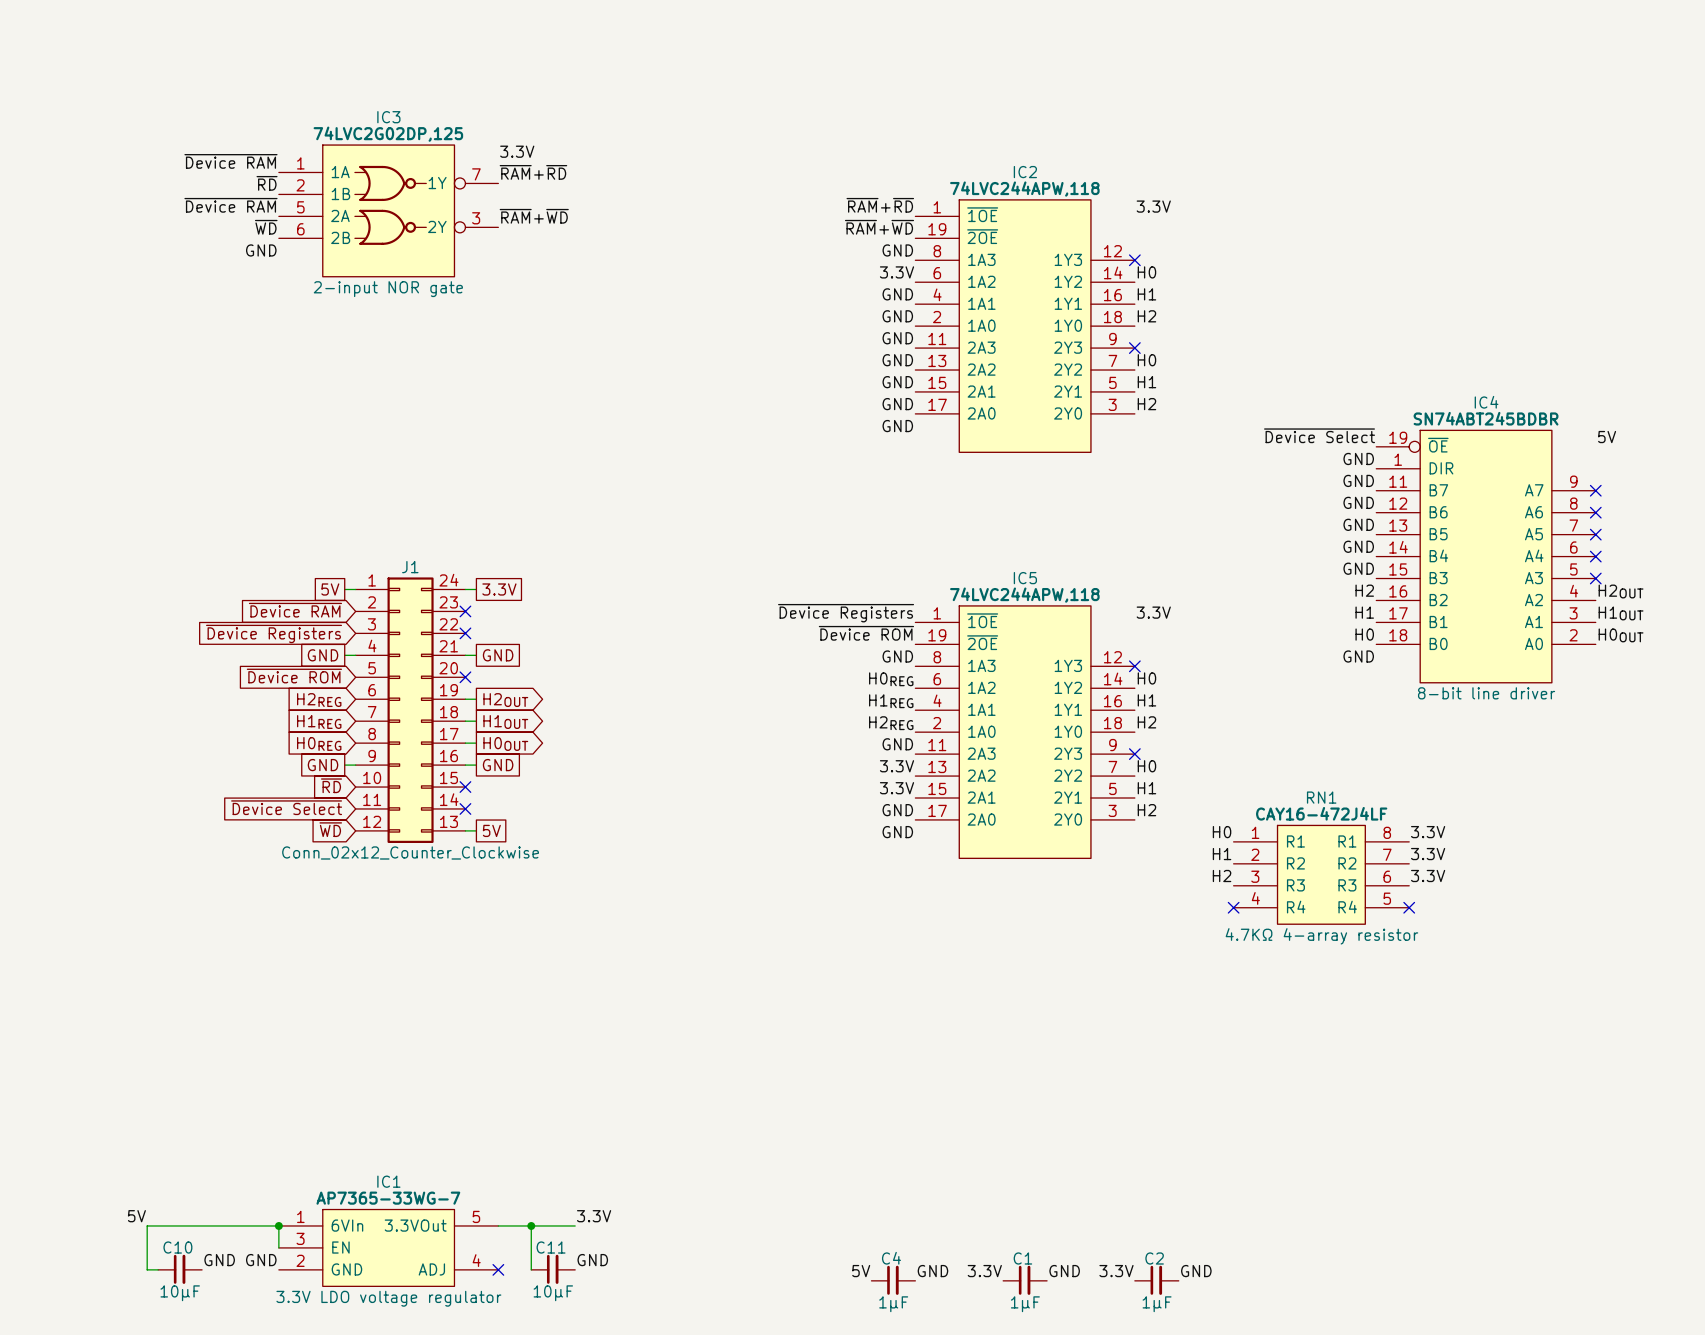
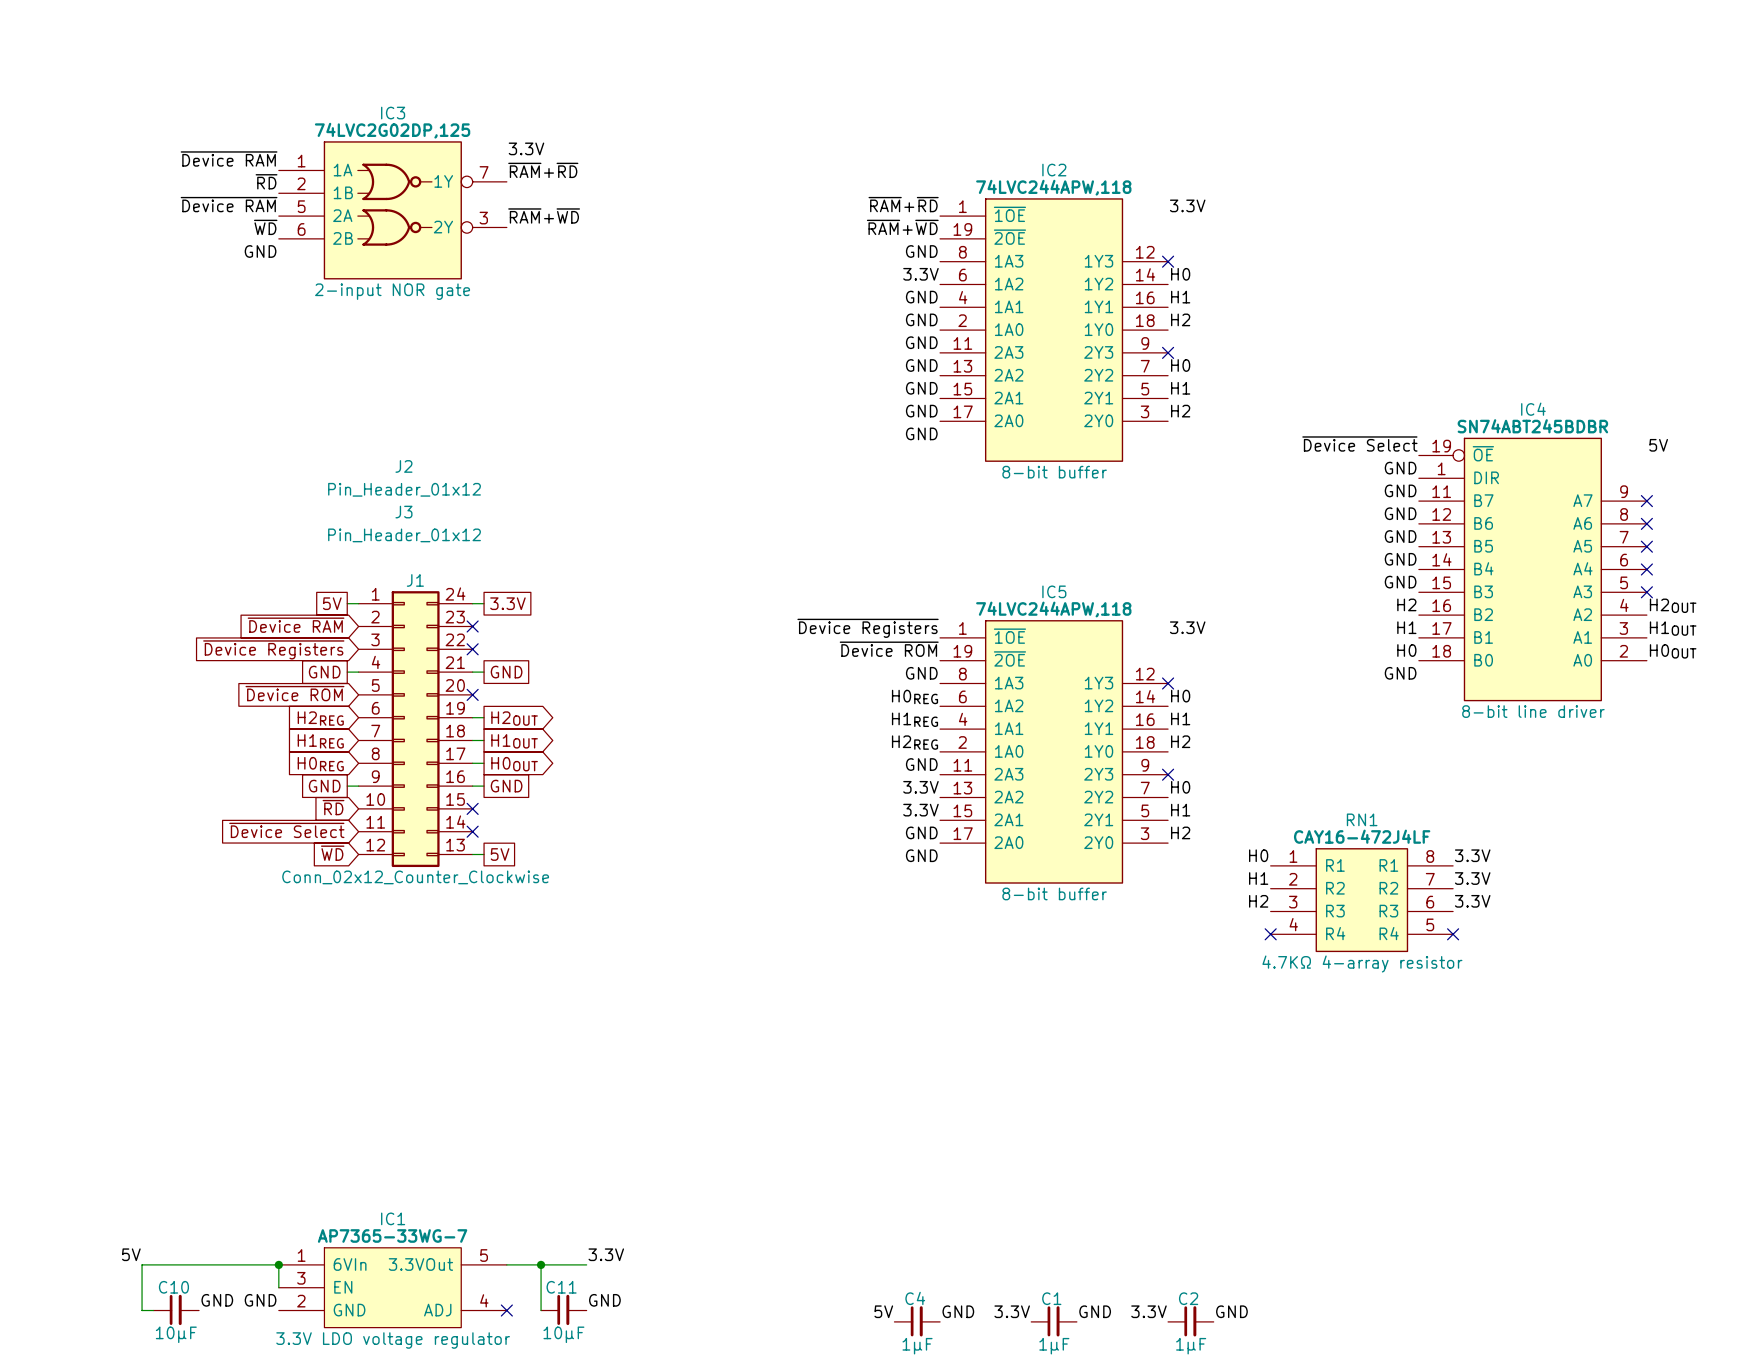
IC2 text: none -> 8-bit buffer (1054, 472)
J2: none -> Pin_Header_01x12 (404, 478)
J3: none -> Pin_Header_01x12 (404, 524)
IC5 text: none -> 8-bit buffer (1054, 893)

